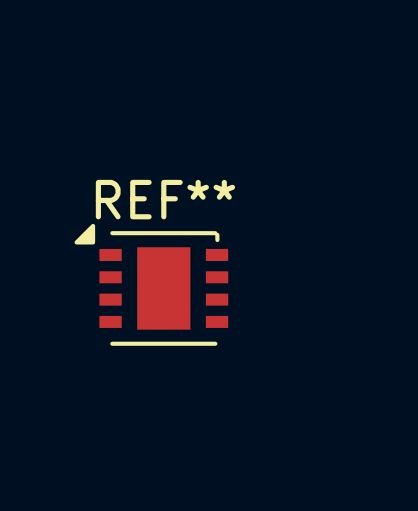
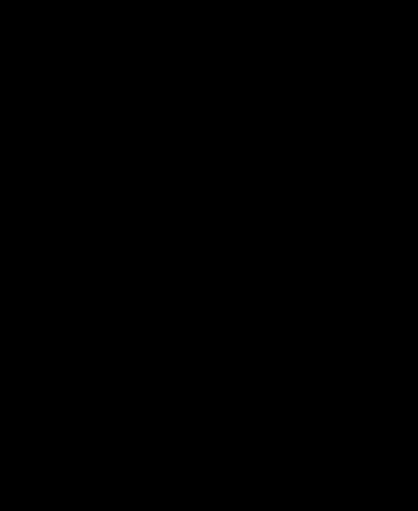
REF**: (151, 284) -> none

